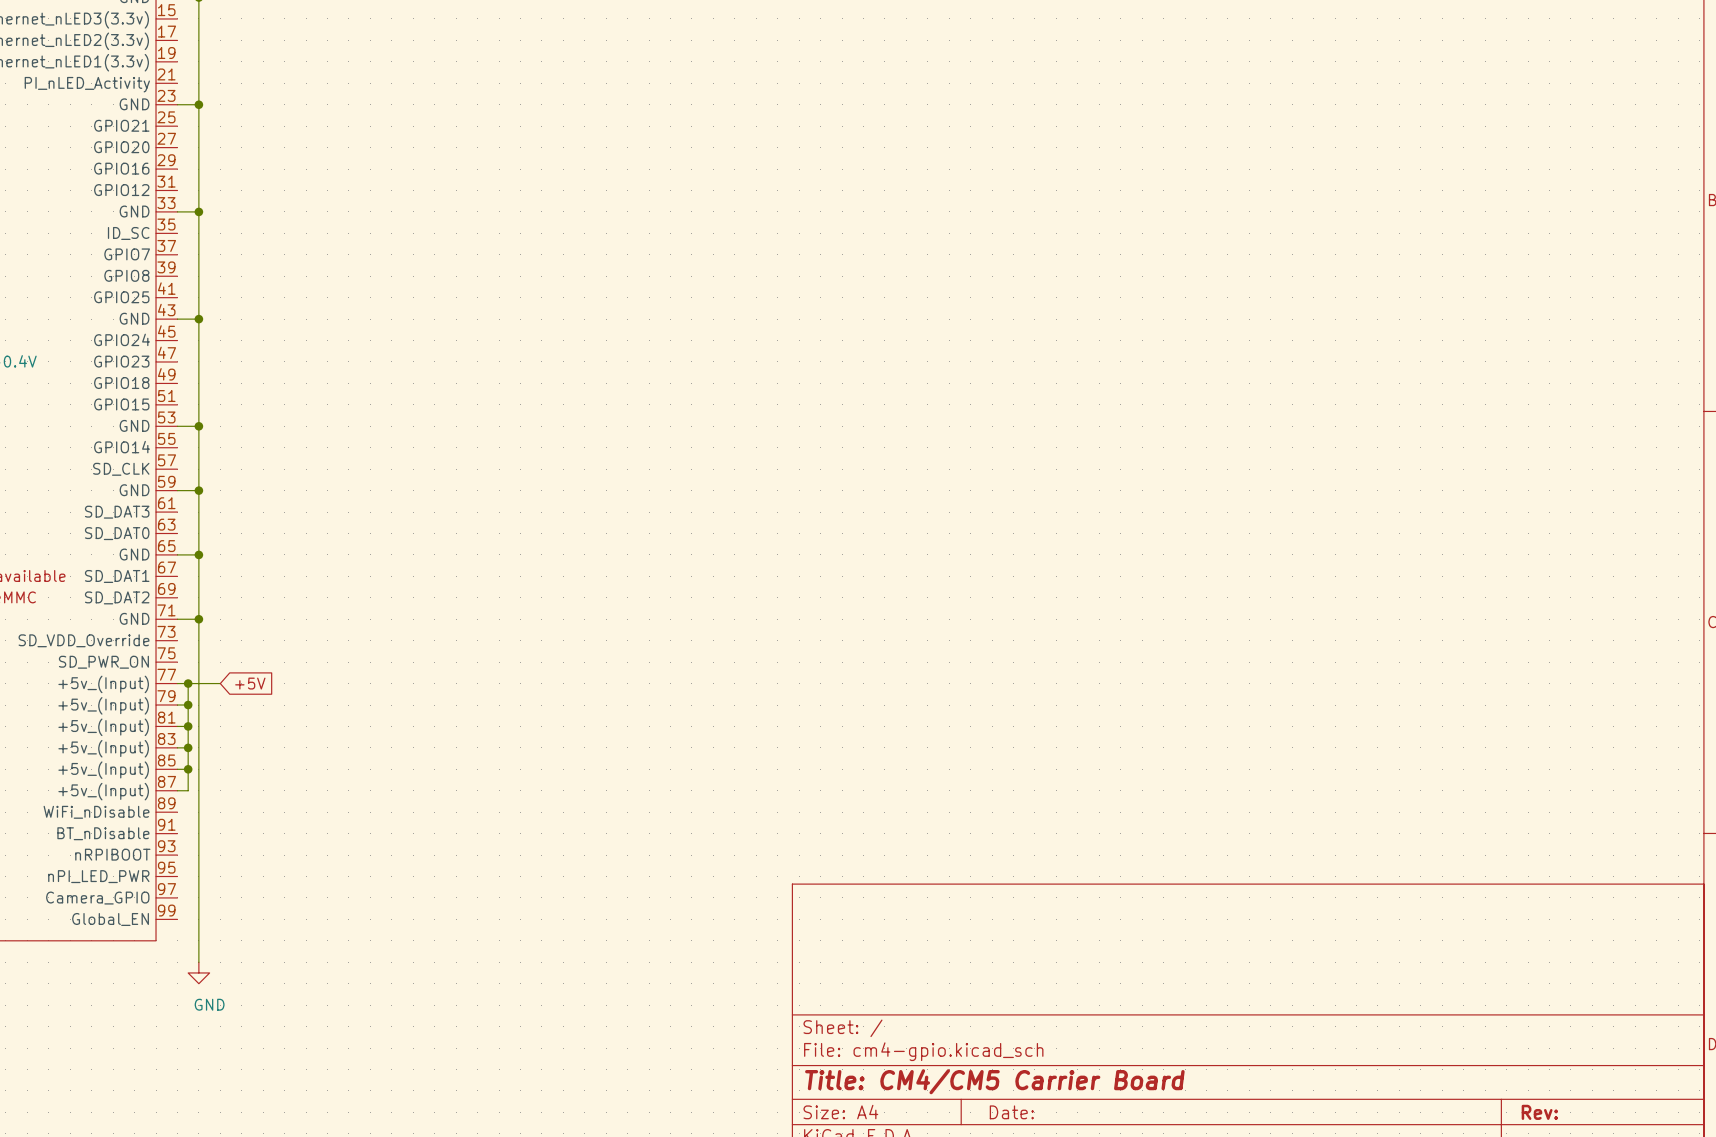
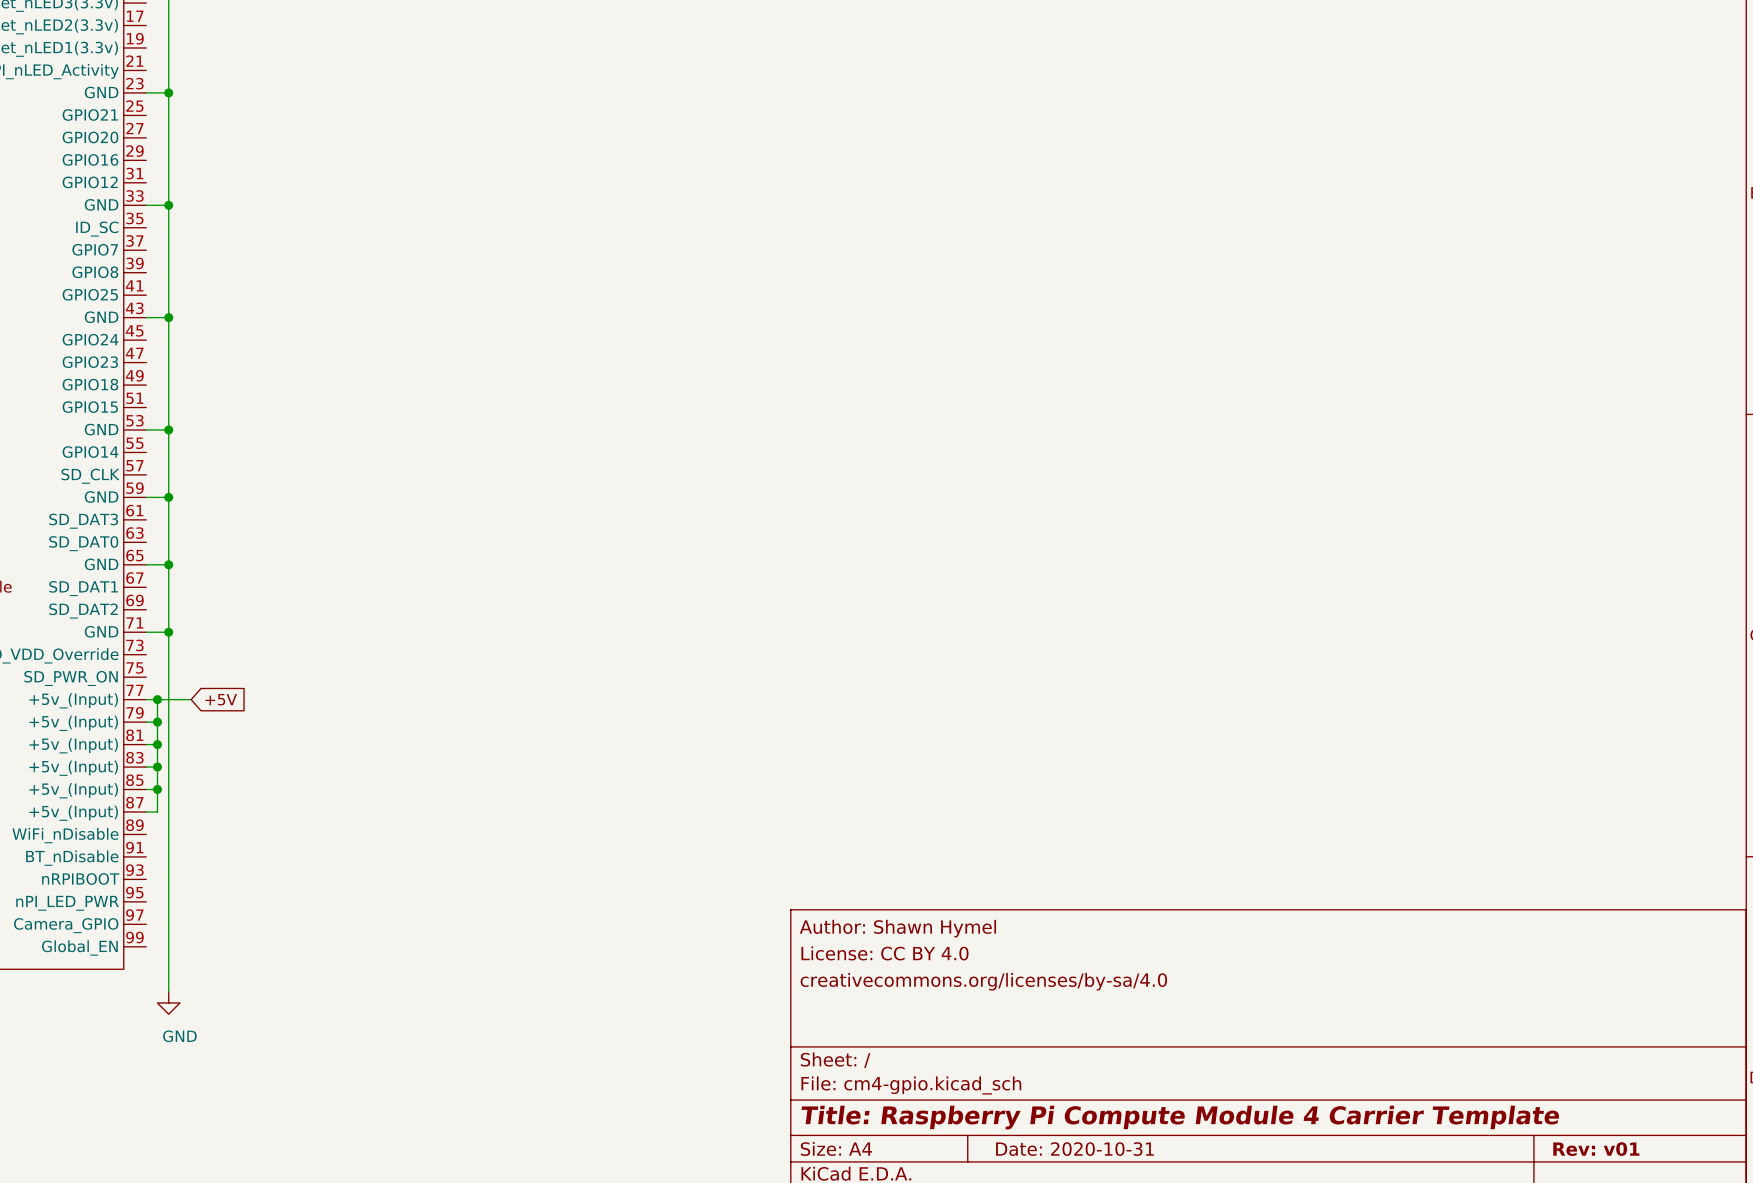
title block: none -> Author: Shawn Hymel (897, 928)
title block: none -> License: CC BY 4.0 (884, 953)
title block: none -> creativecommons.org/licenses/by-sa/4.0 (983, 981)
title block: Title: CM4/CM5 Carrier Board (994, 1081) -> Title: Raspberry Pi Compute Module 4 Carrier Template (1180, 1117)
title block: Date: (1011, 1112) -> Date: 2020-10-31 (1074, 1149)
title block: Rev: (1539, 1112) -> Rev: v01 (1596, 1149)

